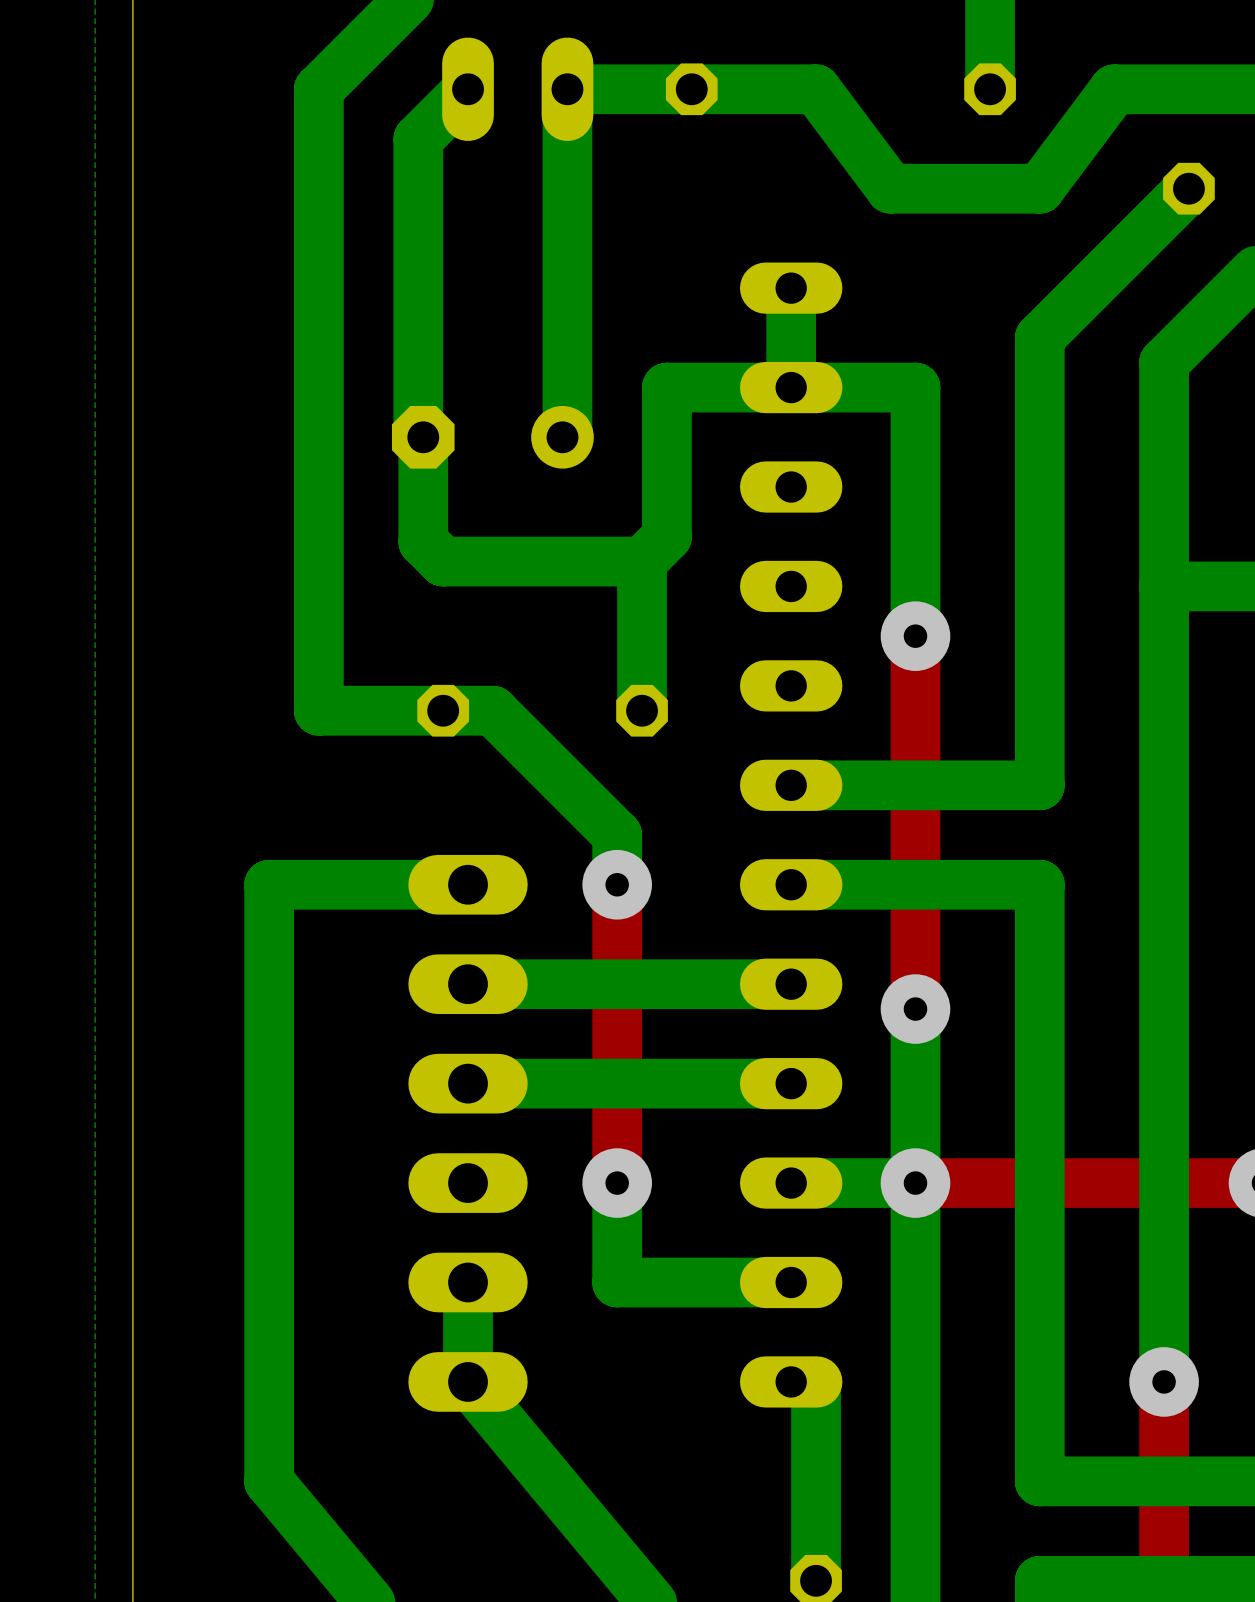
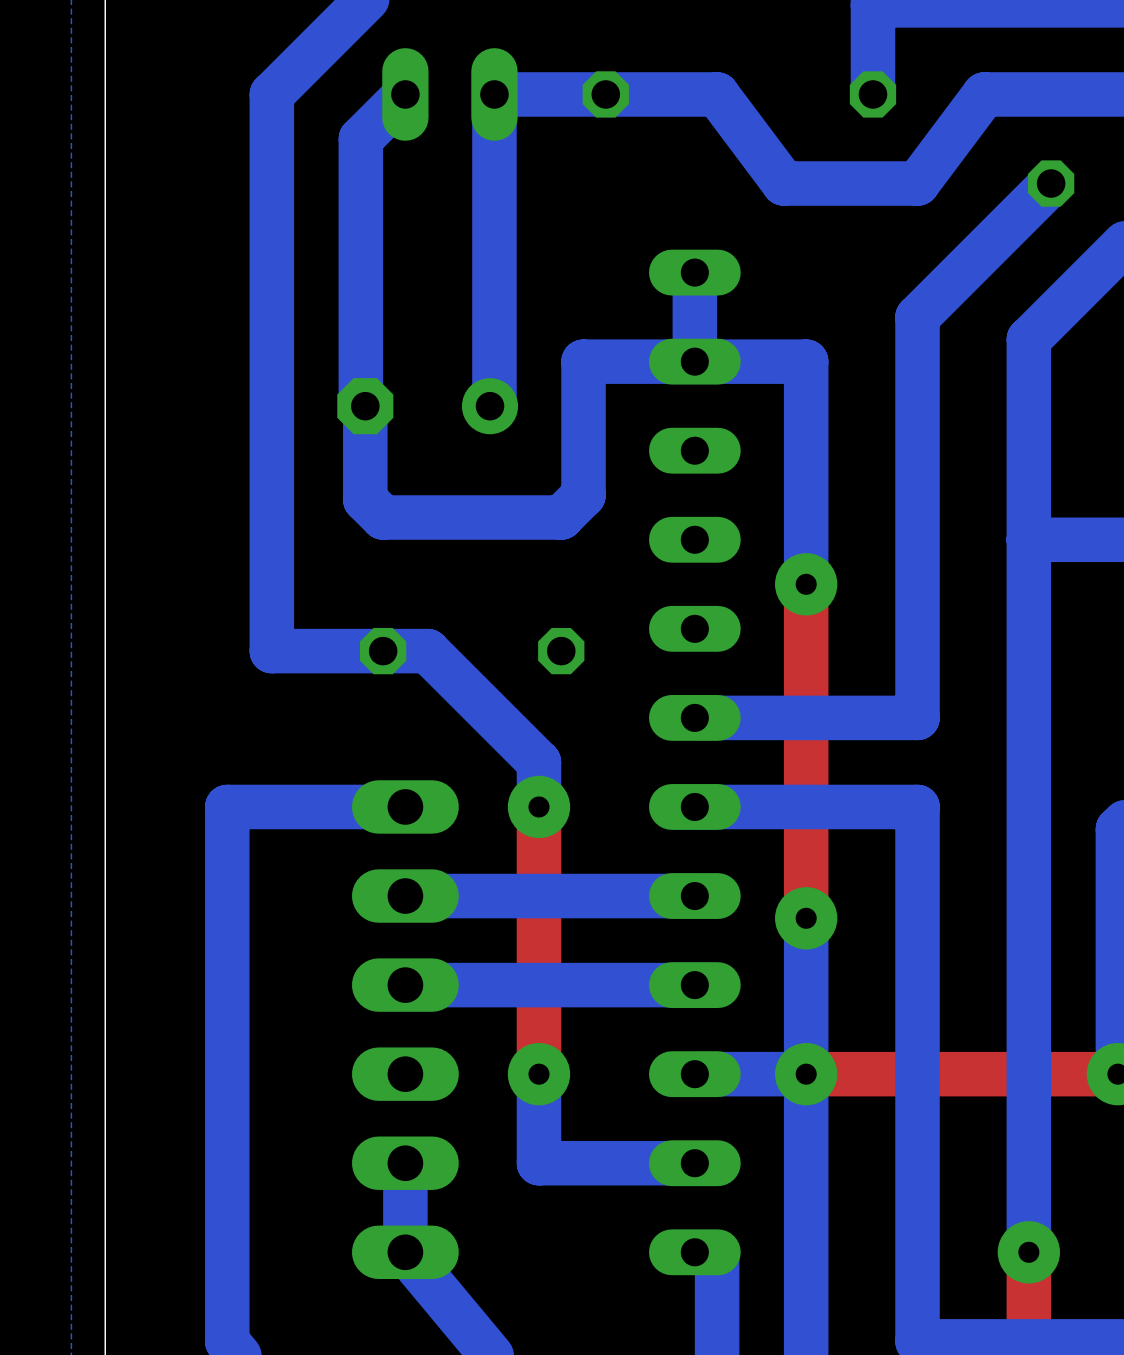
bottom track: (642, 561) (642, 710) -> none

